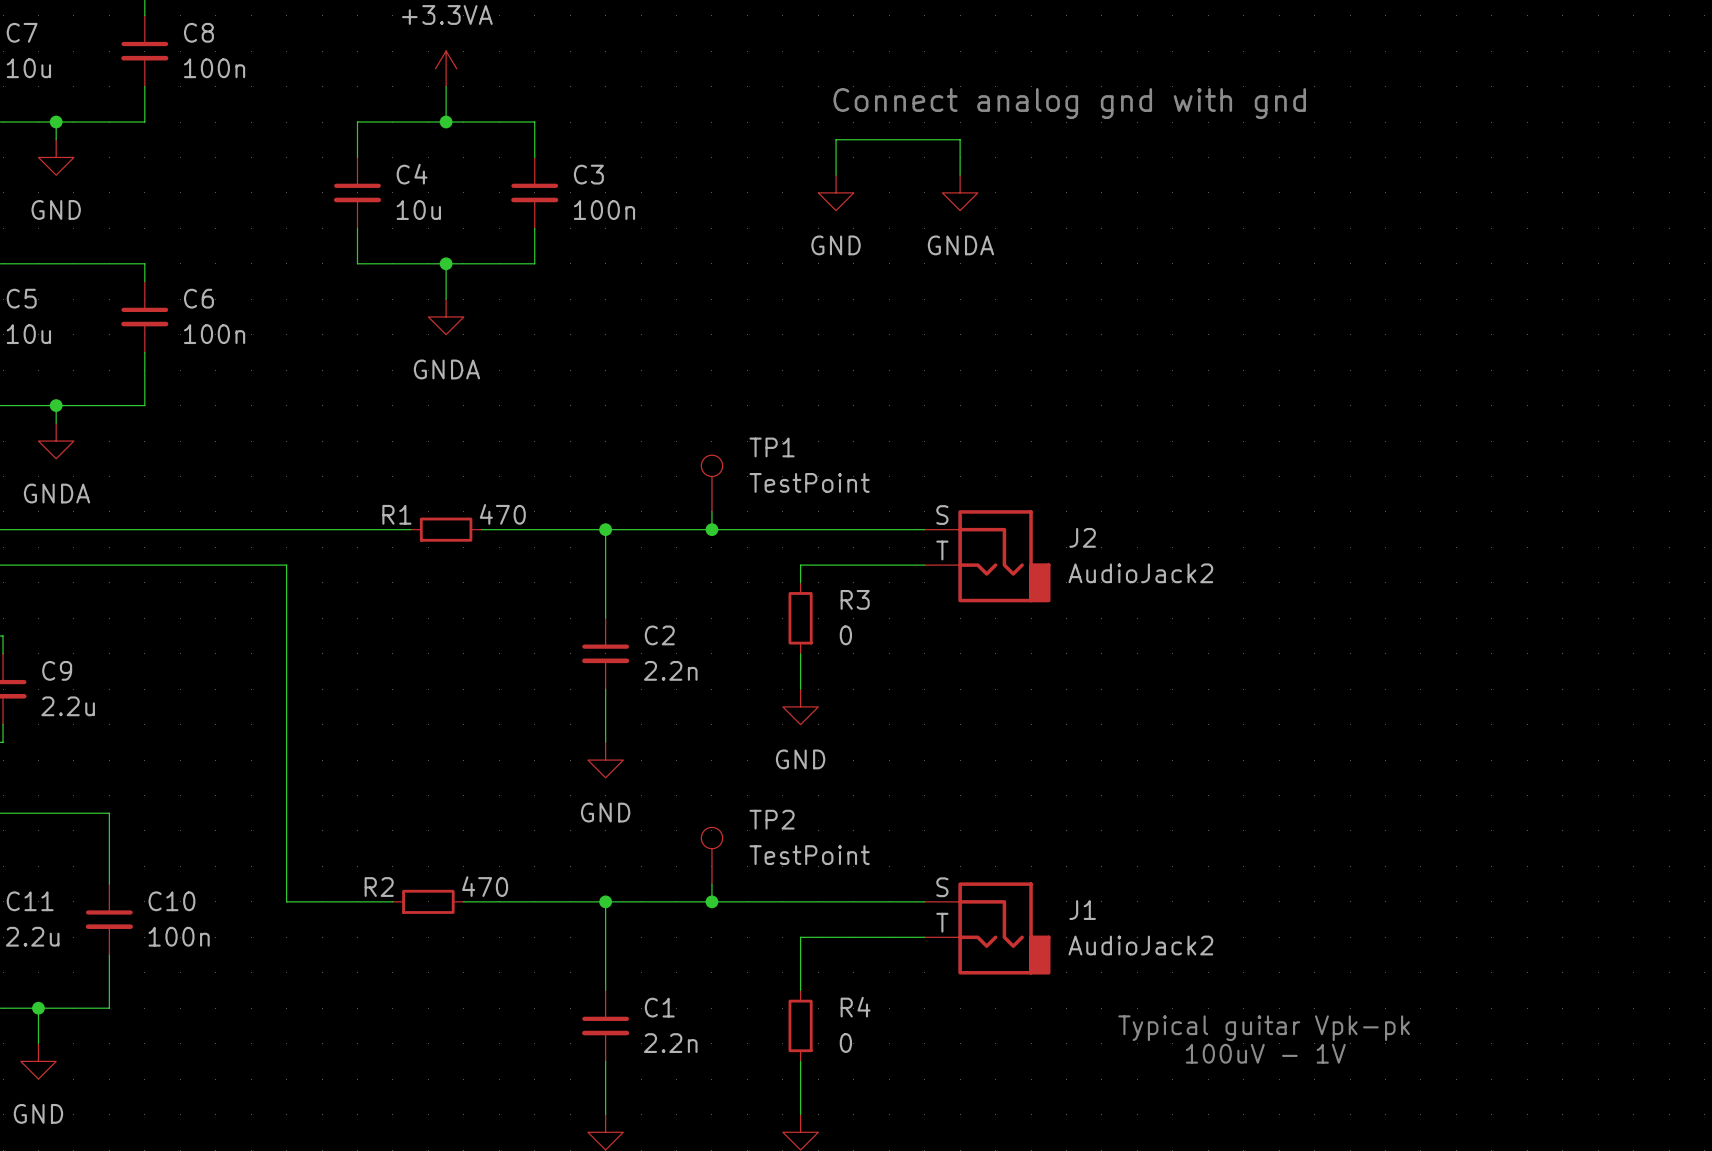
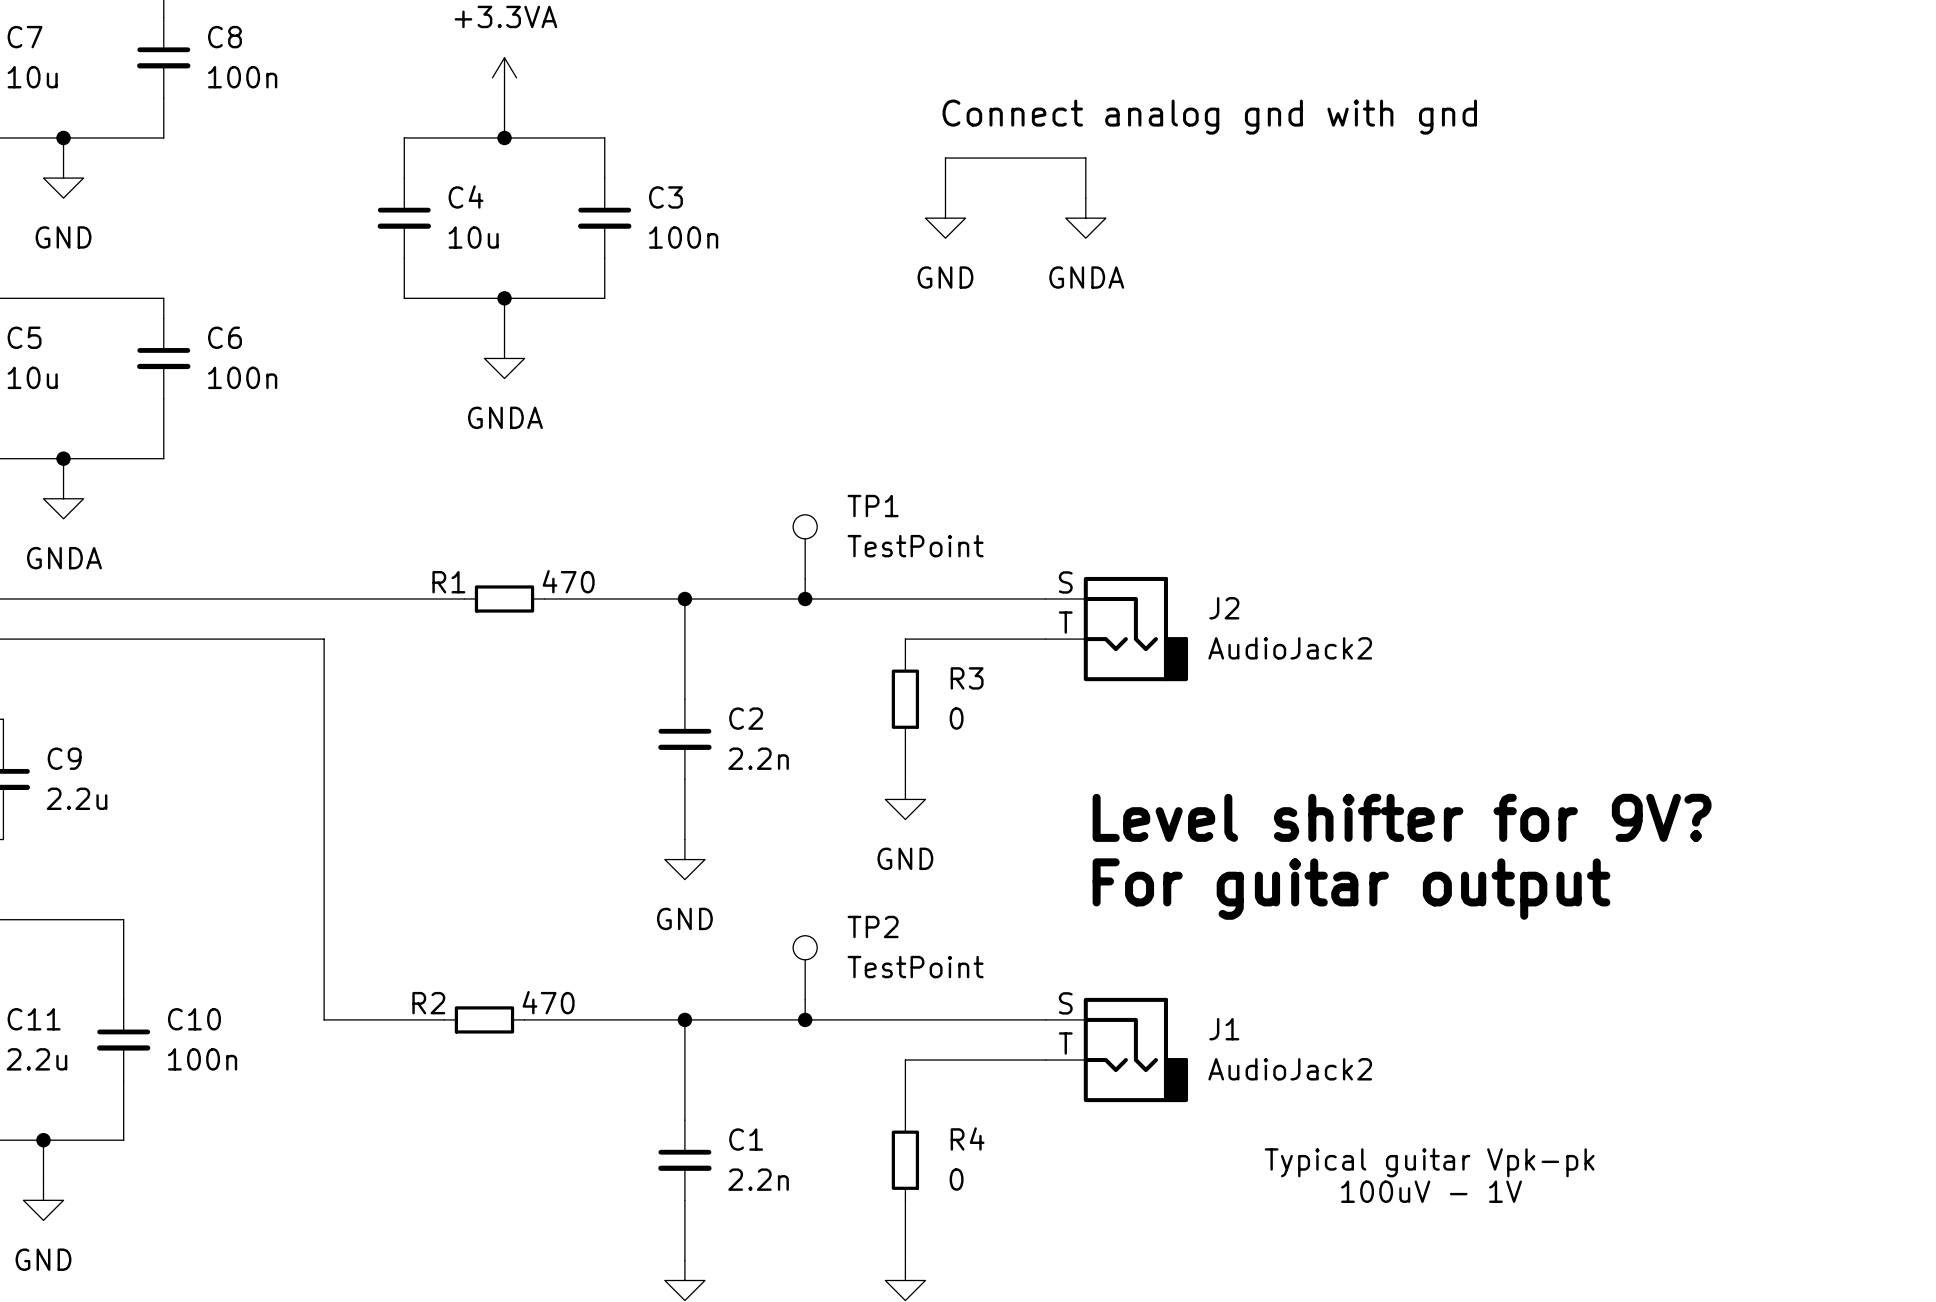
text: none -> Level shifter for 9V? (1402, 817)
text: none -> For guitar output (1351, 889)

